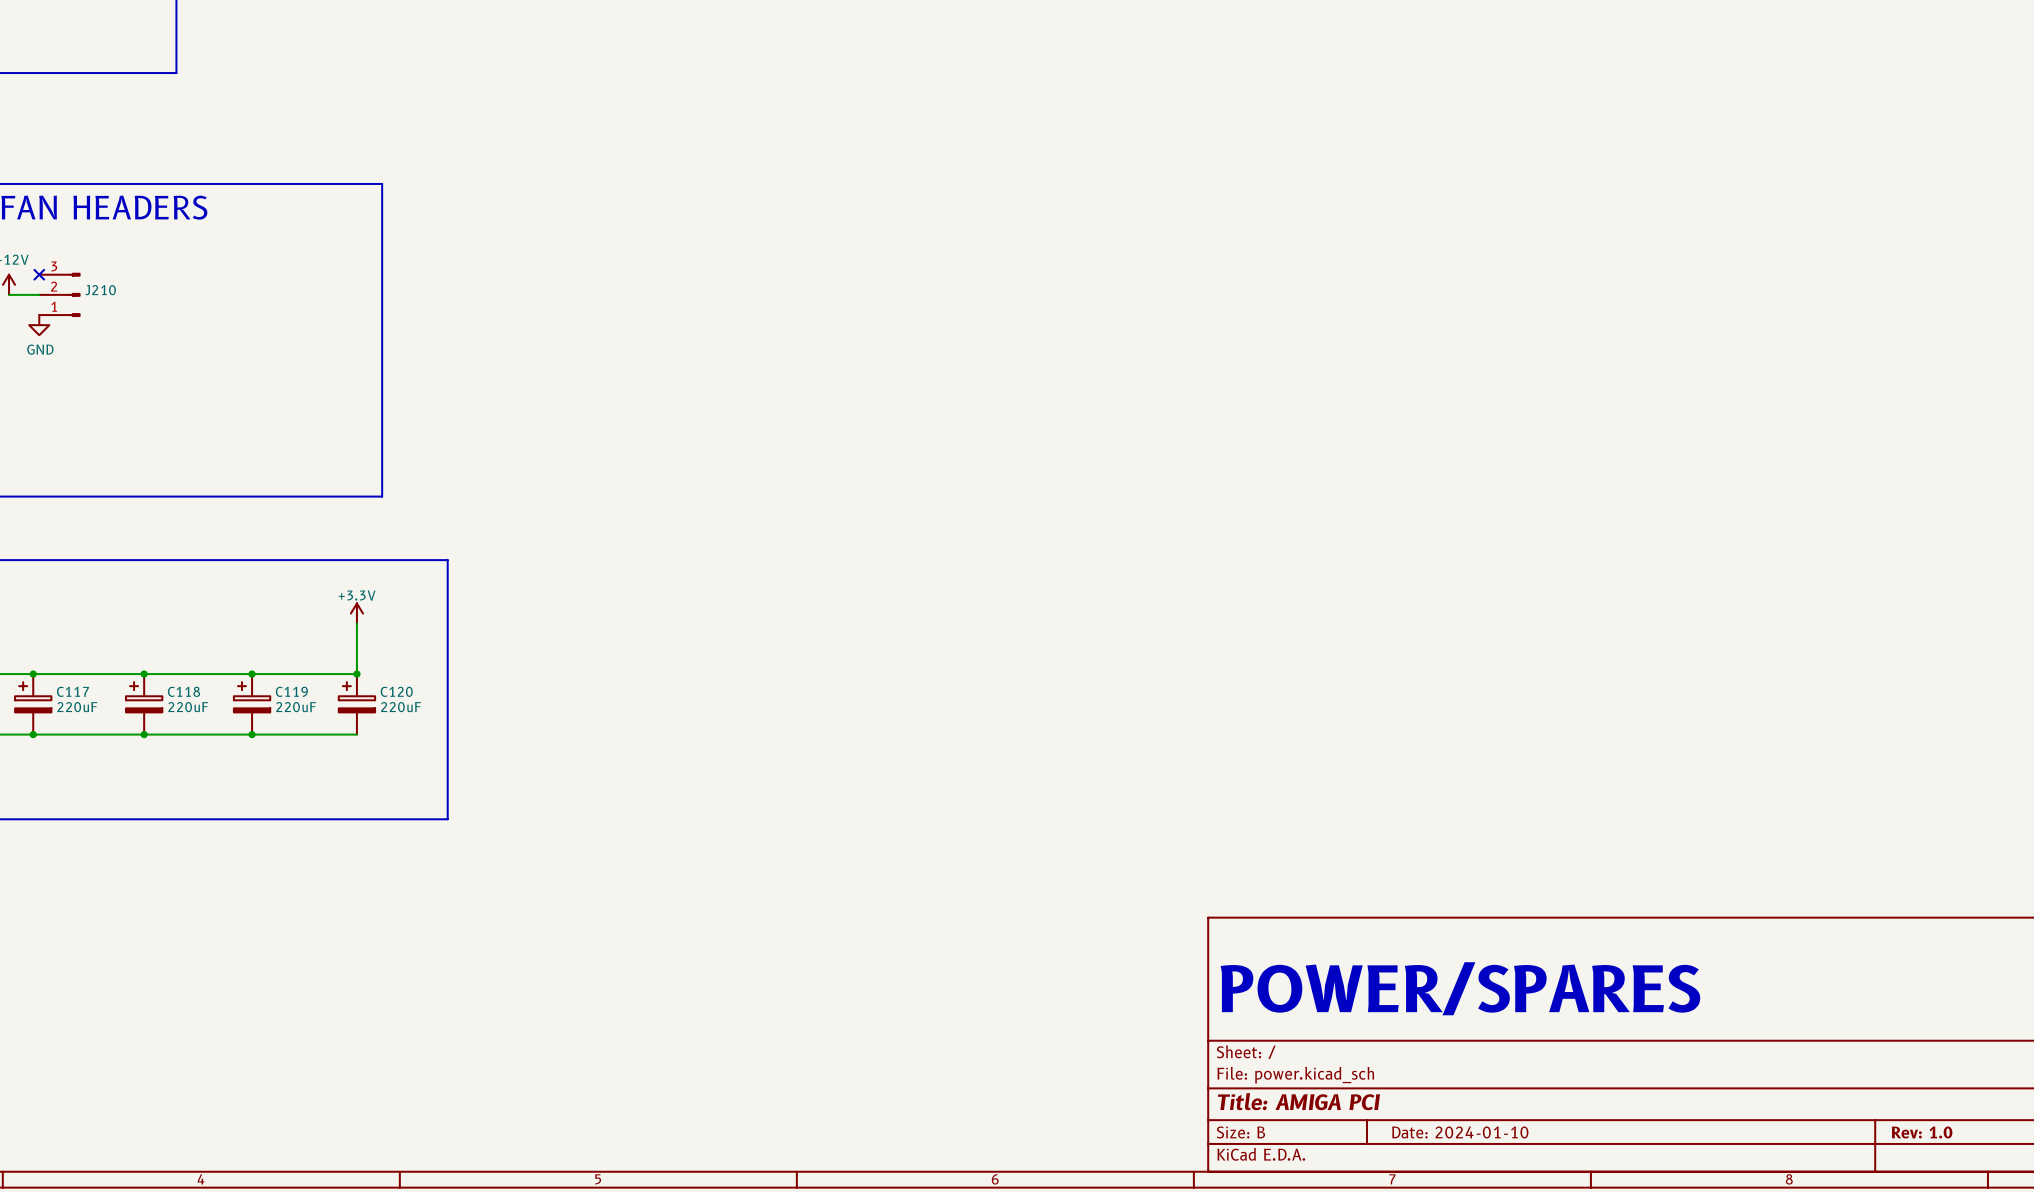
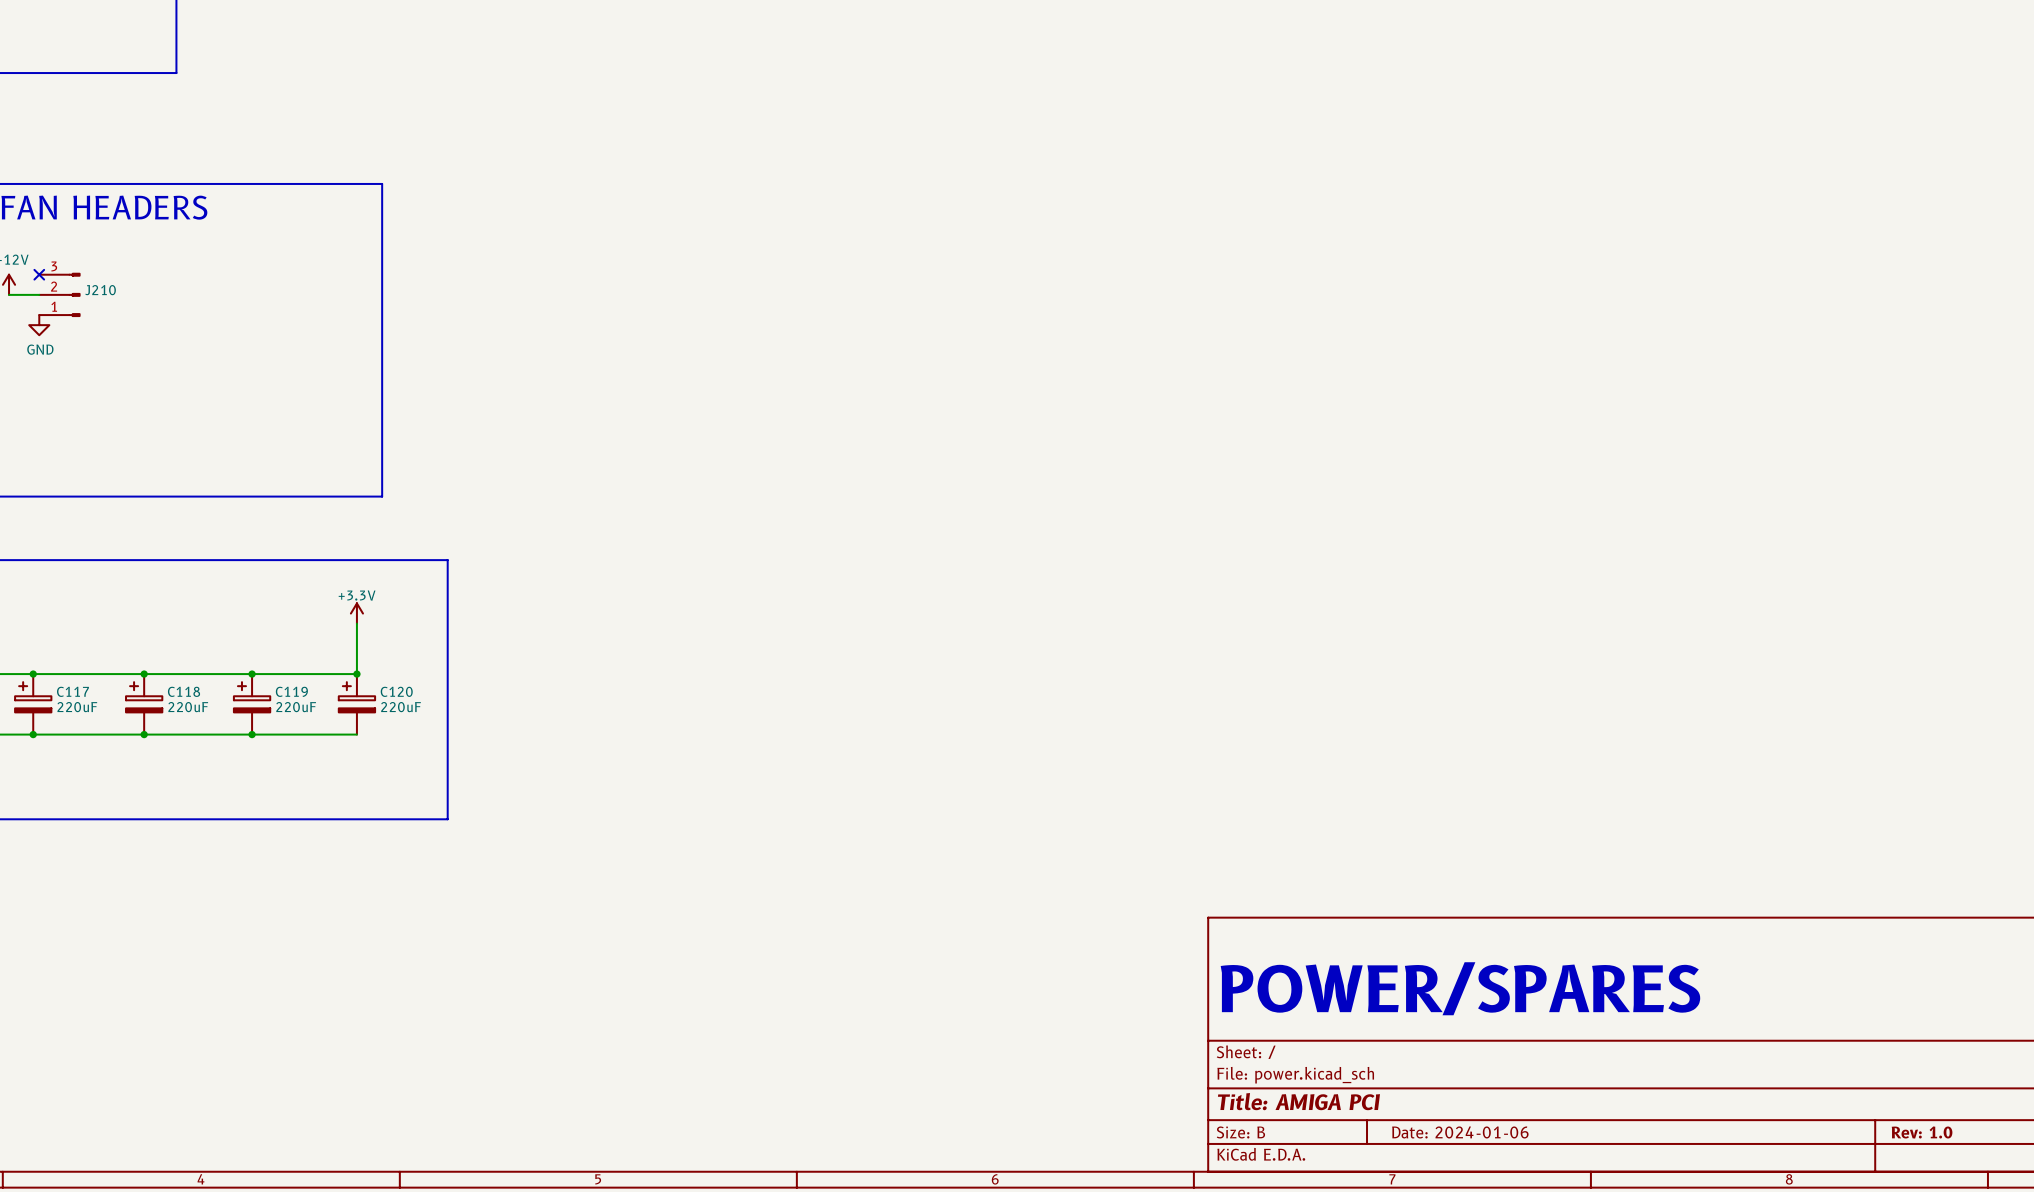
title block: Date: 2024-01-10 (1460, 1132) -> Date: 2024-01-06 (1460, 1132)

